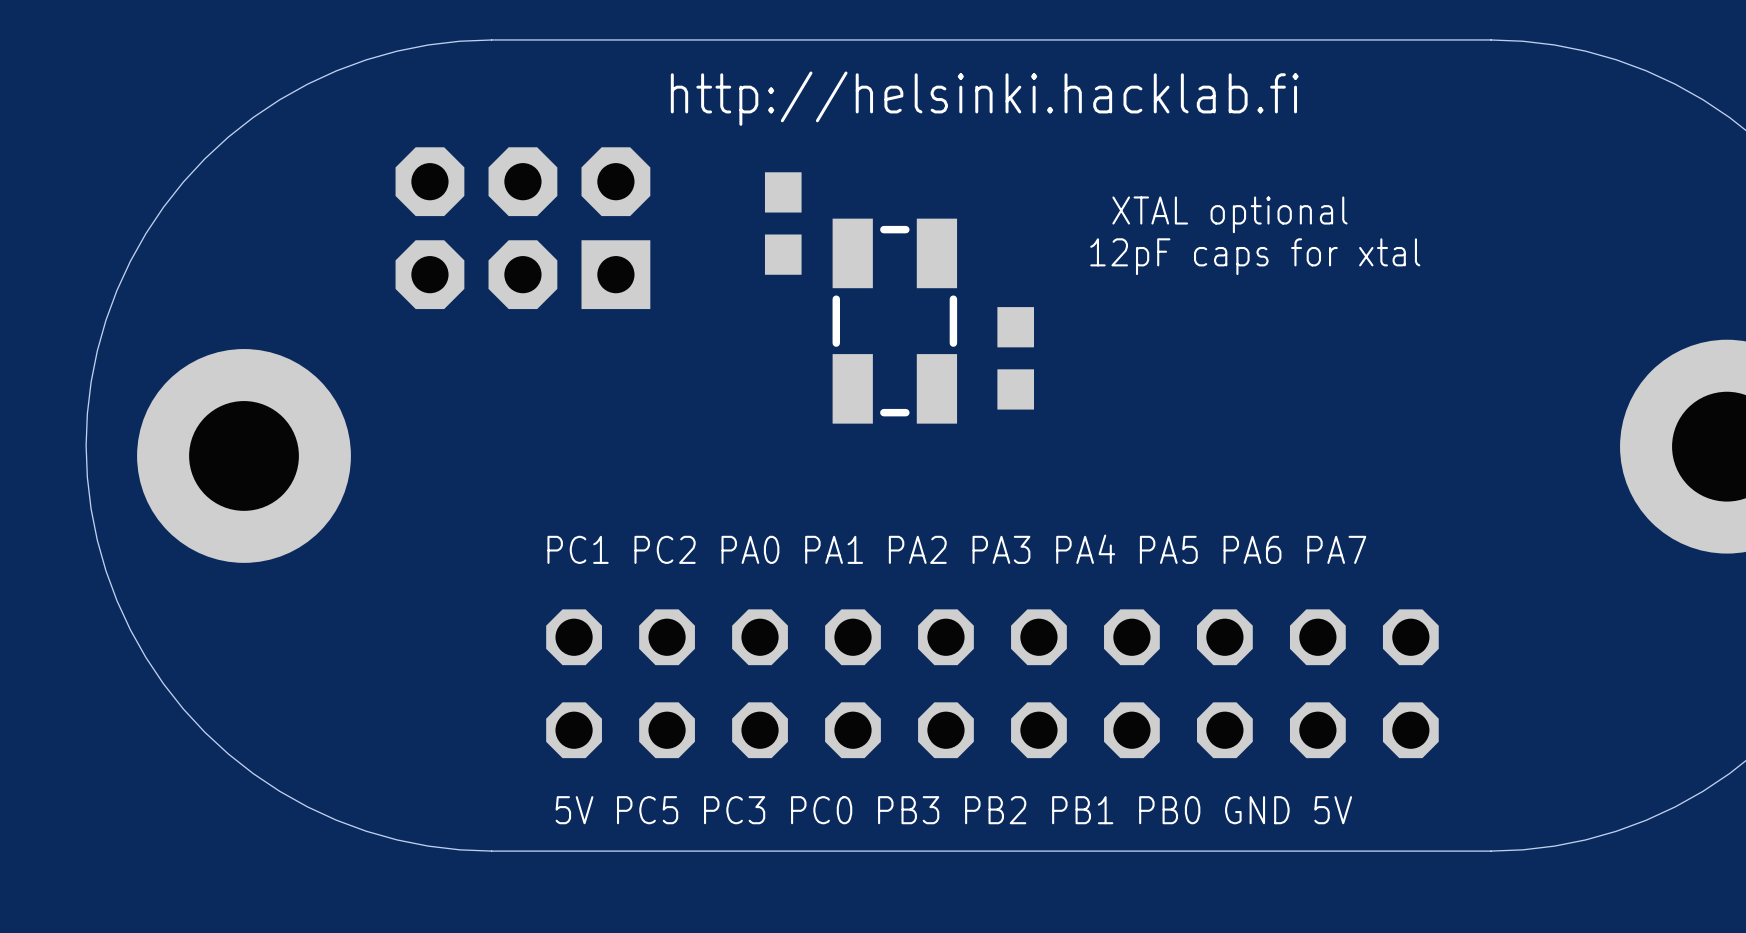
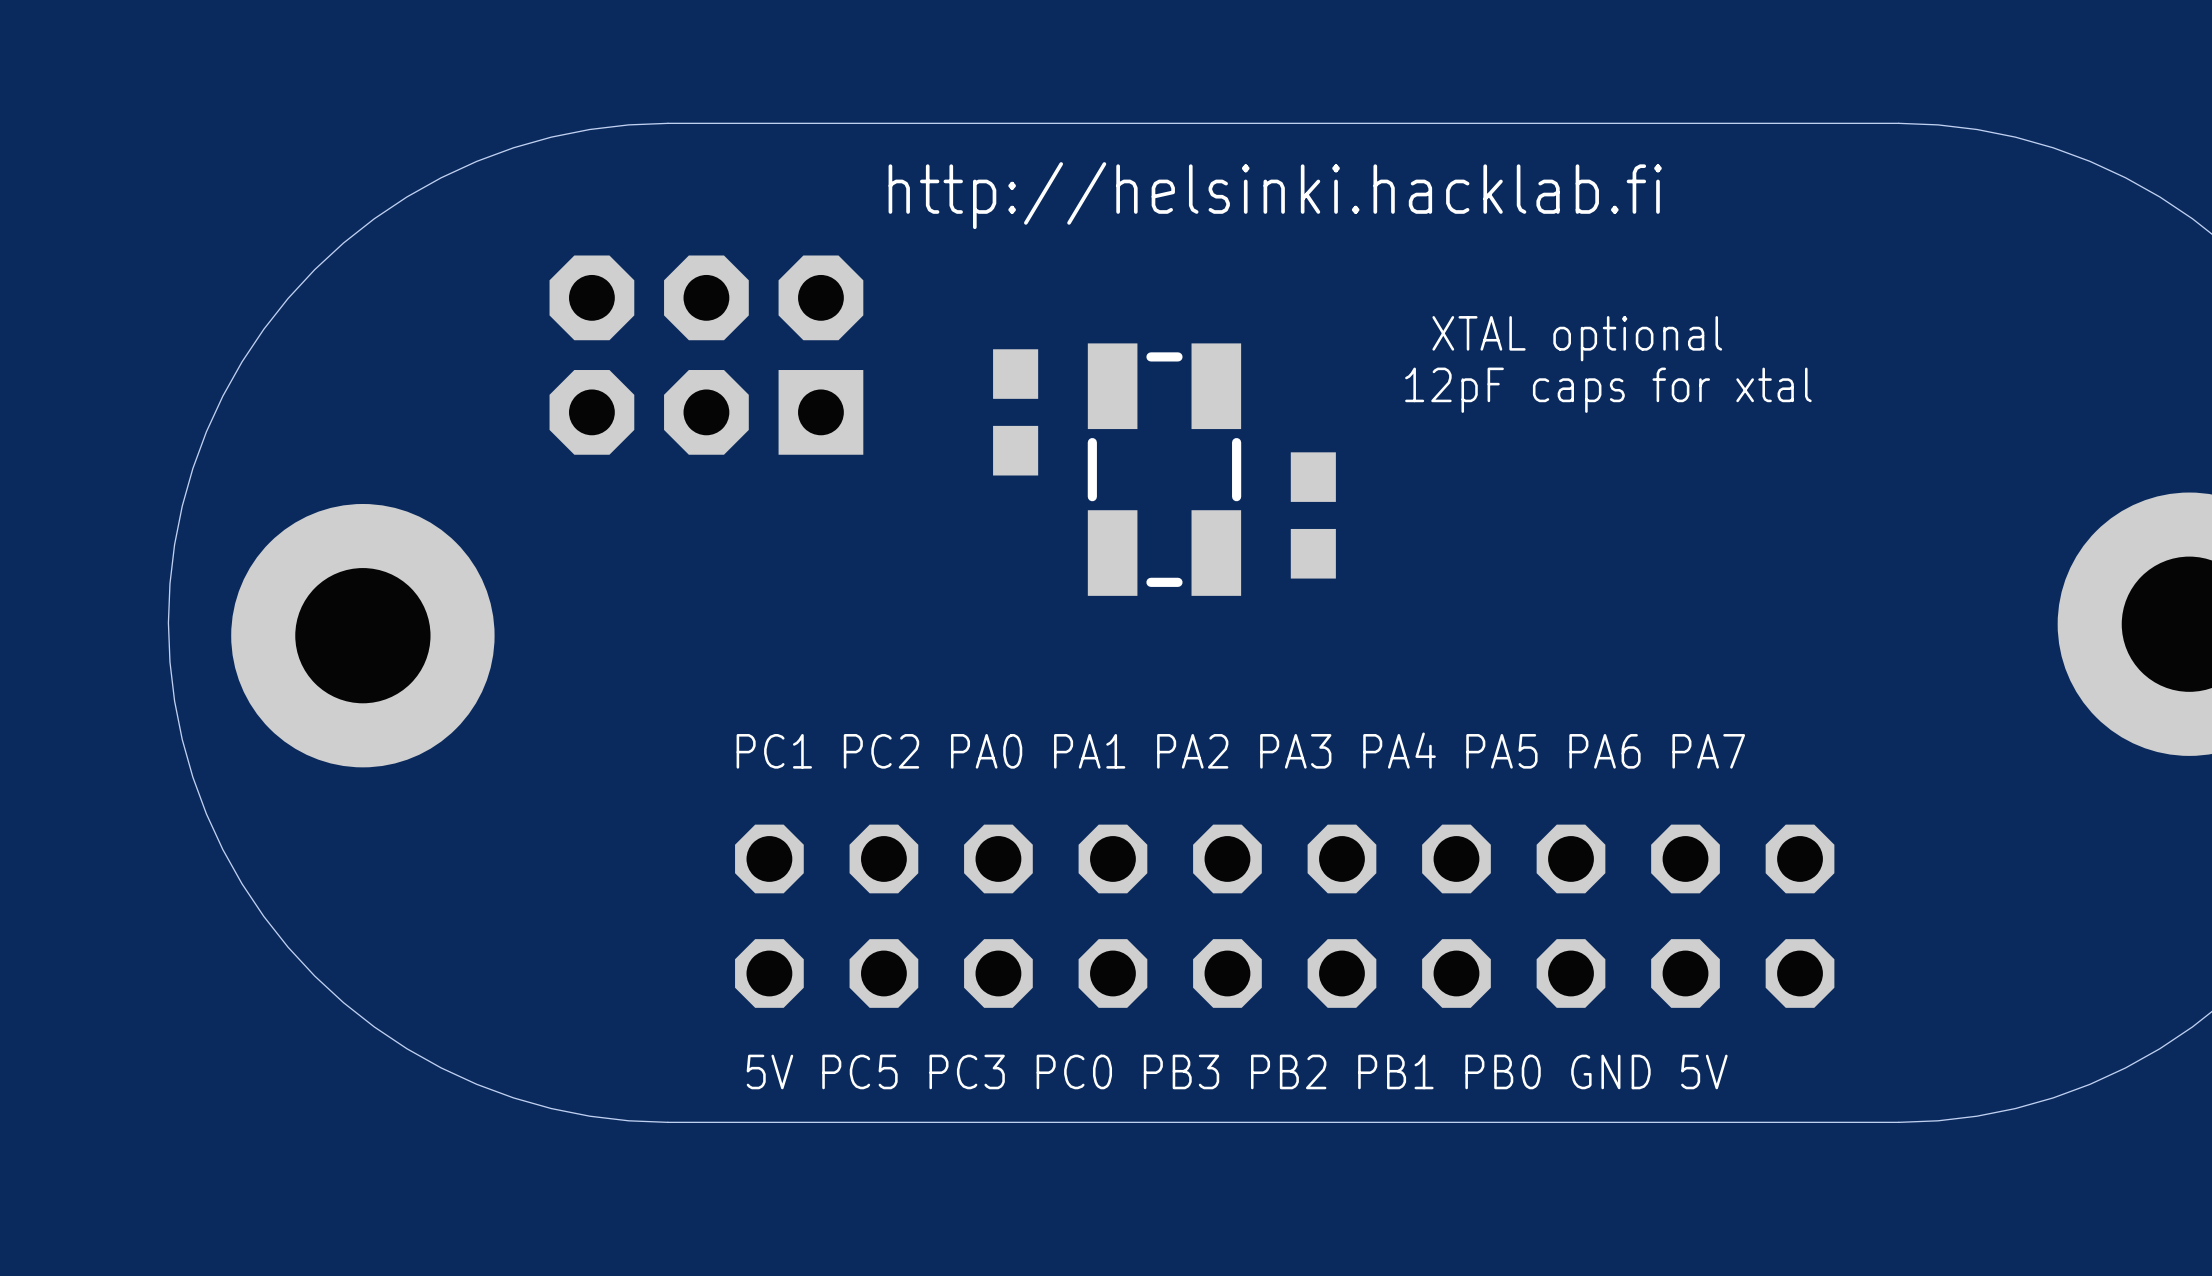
part position: (783, 223) -> (1015, 412)

